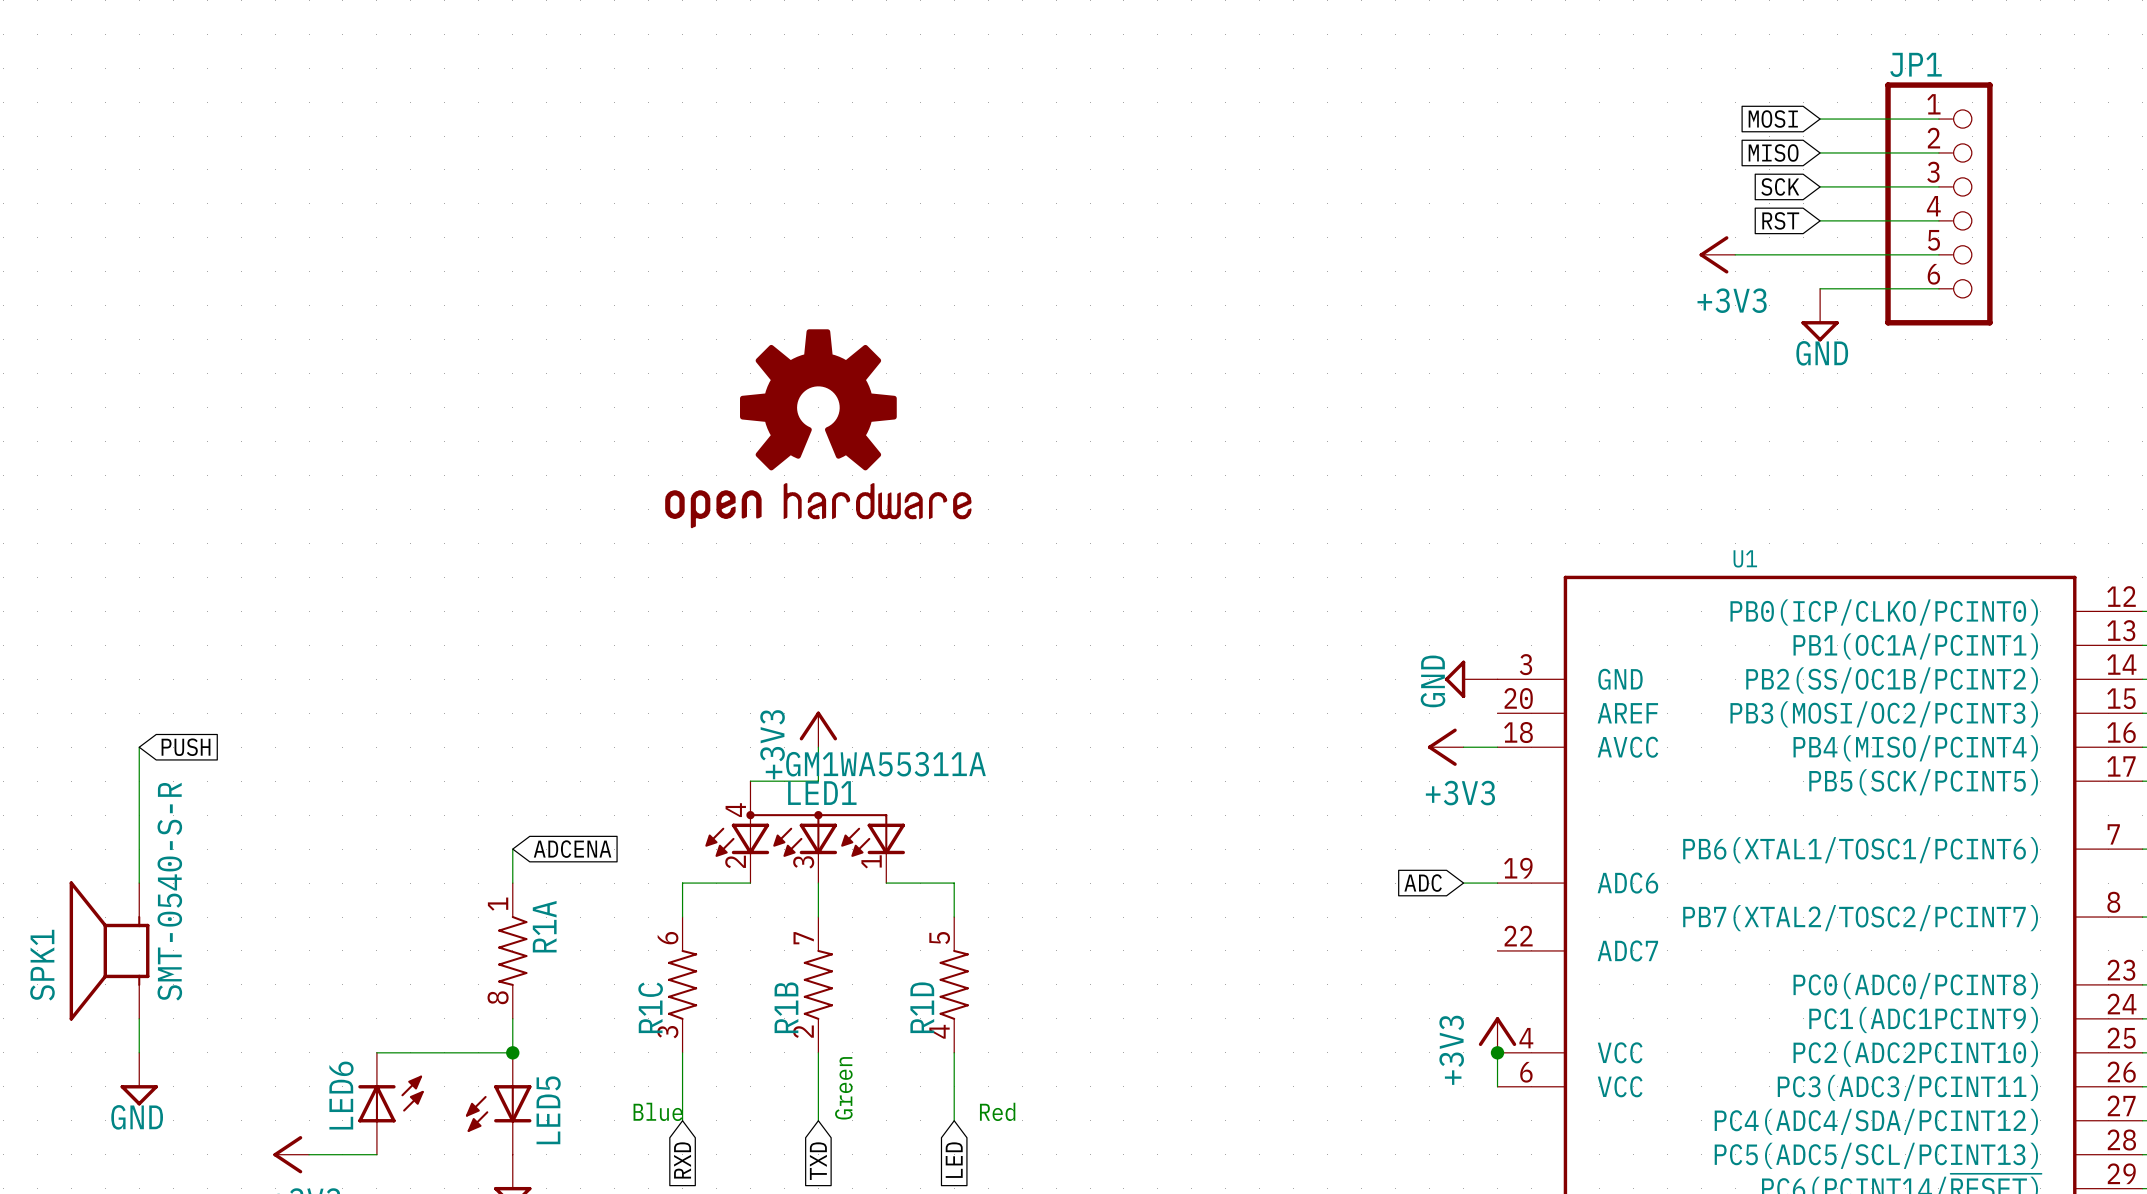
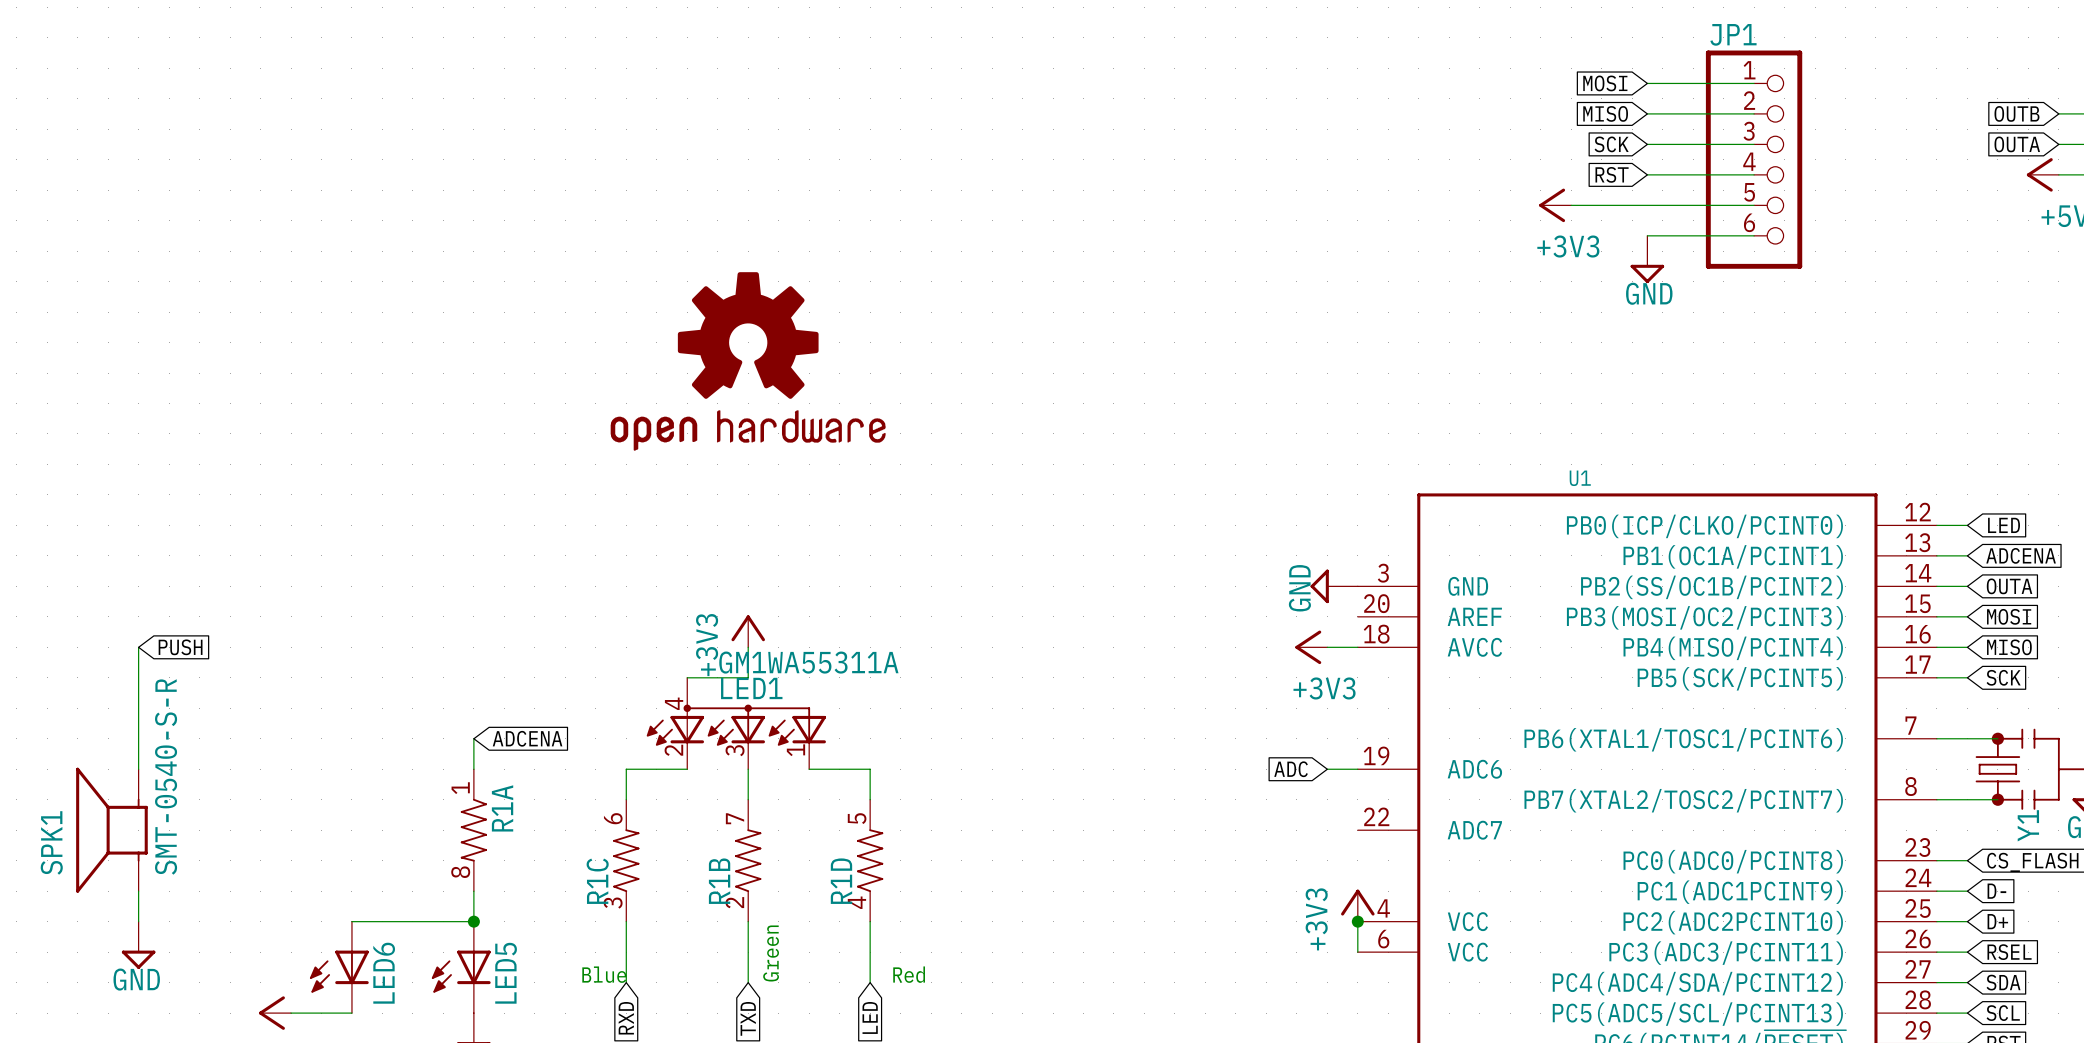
LED6 rotation: 0° (391, 1099) -> 180° (339, 971)

